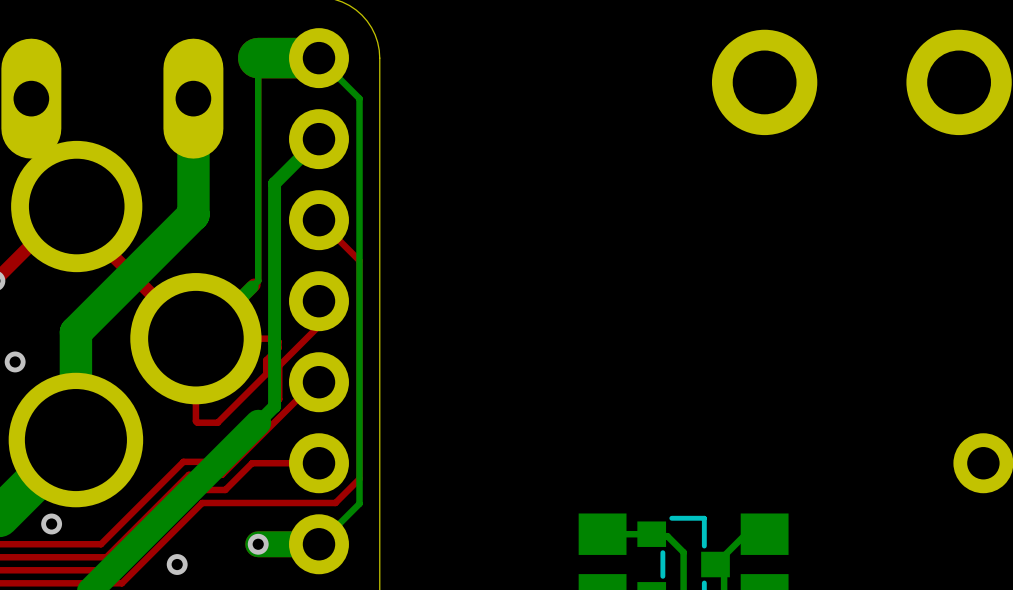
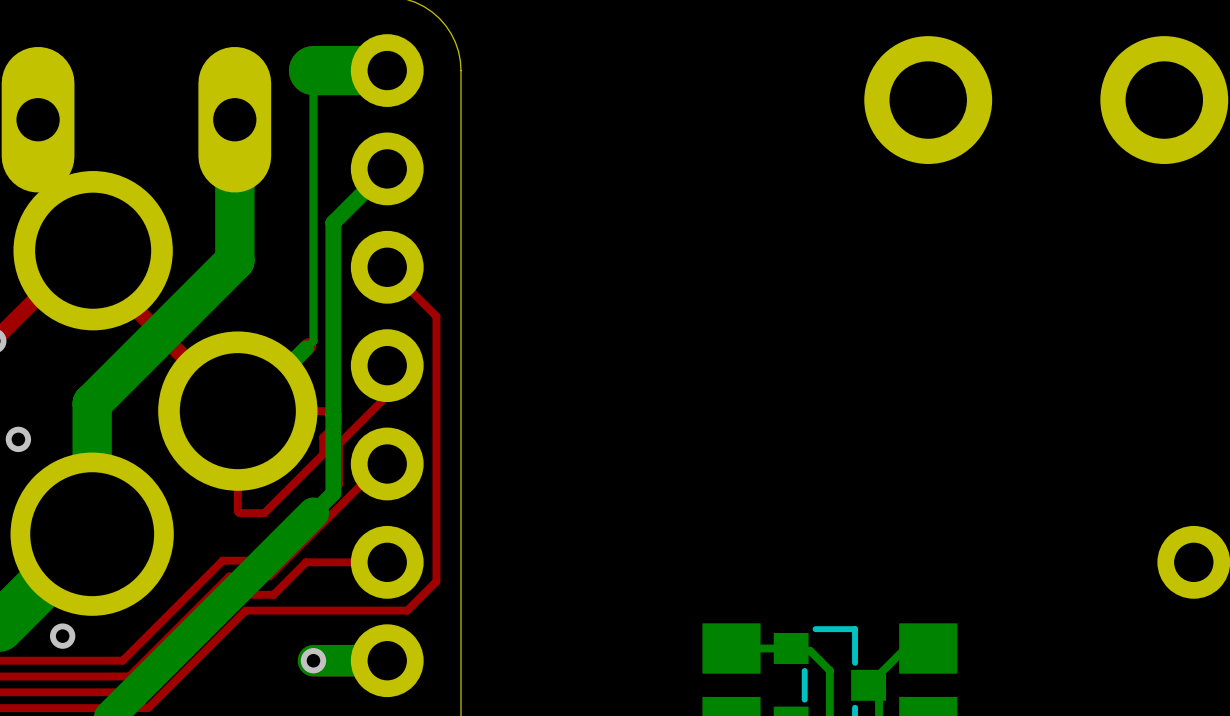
bottom track: (318, 58) (359, 98) (359, 503) (318, 544) -> none
via: (177, 564) -> none

